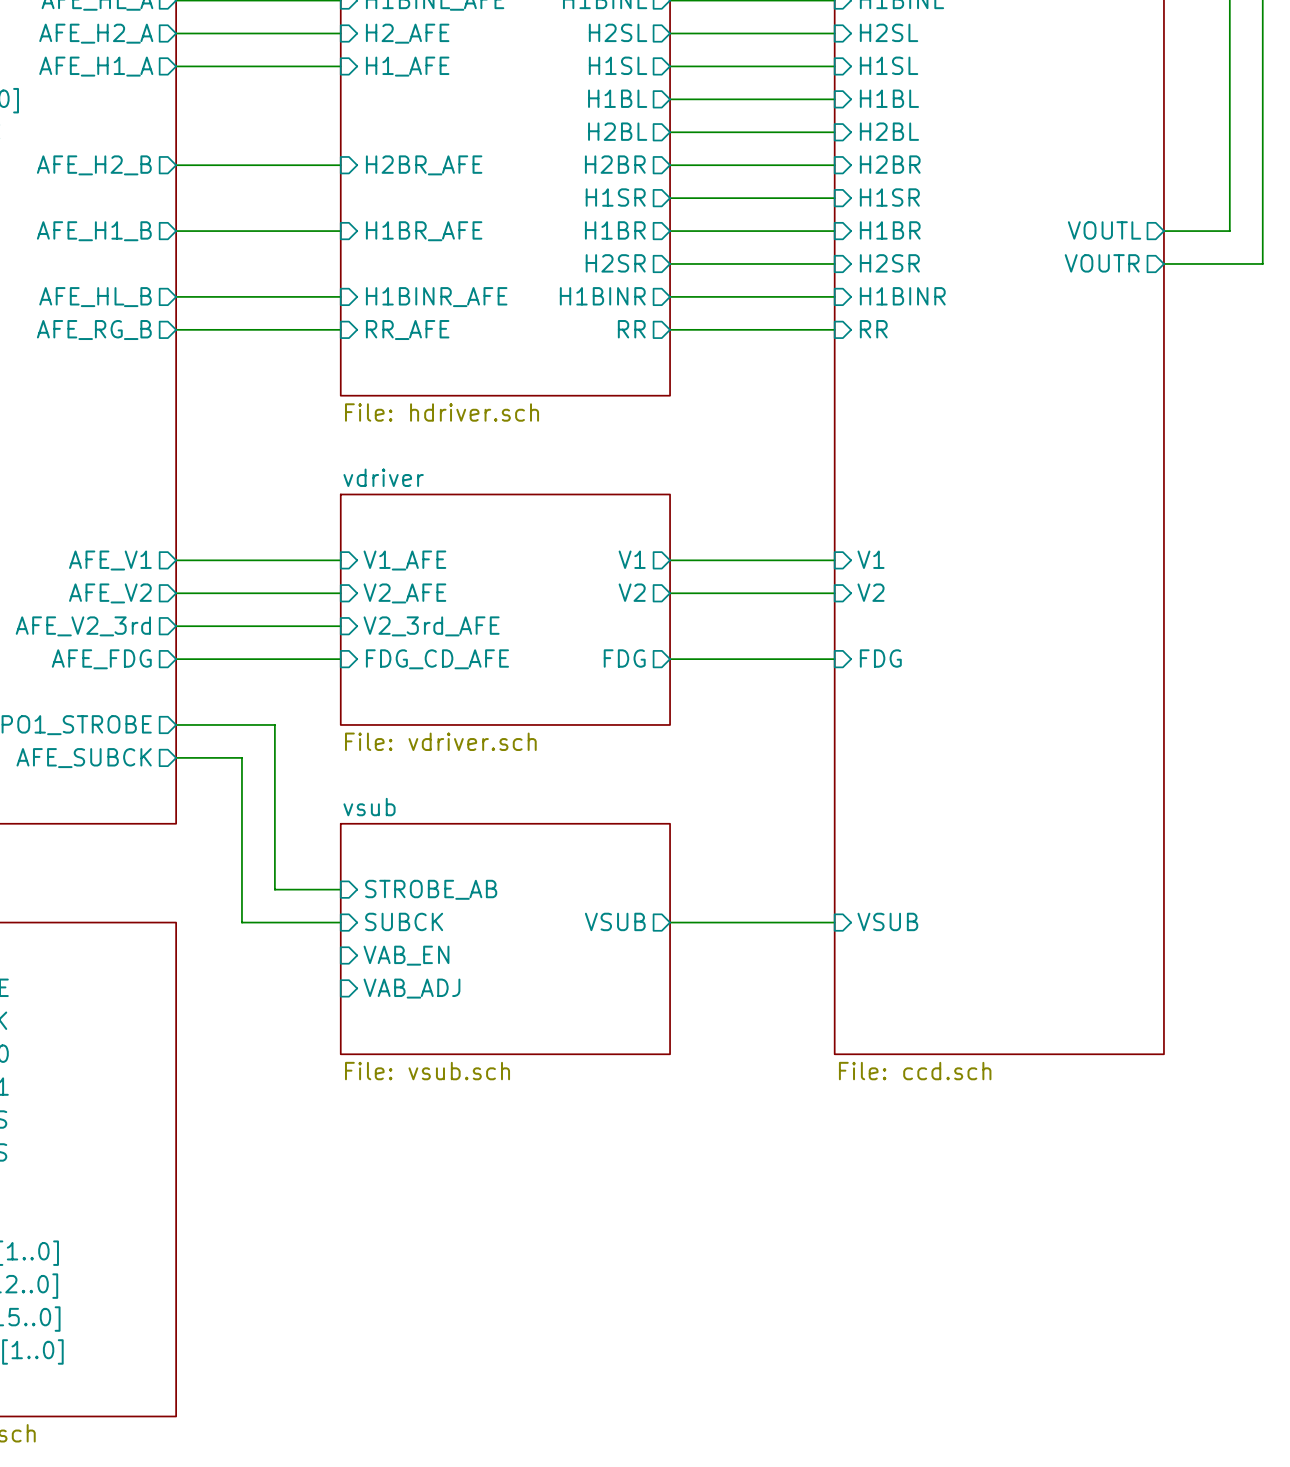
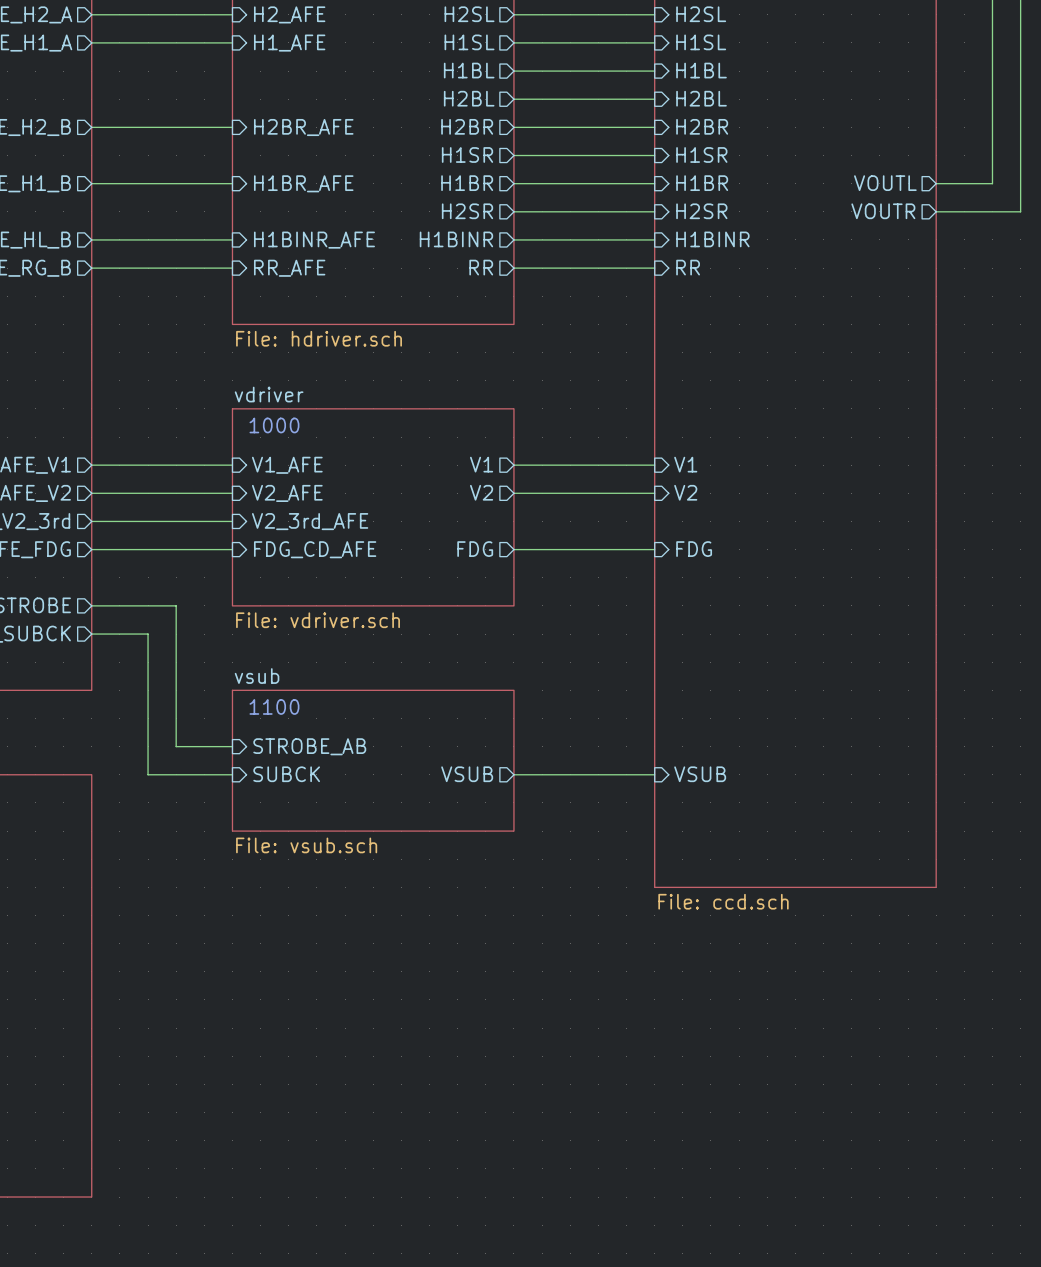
text: none -> 1000 (274, 425)
text: none -> 1100 (274, 706)
sheet vsub: none -> File: vsub.sch (373, 760)
sheet vsub: File: vsub.sch (505, 939) -> none
sheet pin: VAB_EN (406, 955) -> none
sheet pin: VAB_ADJ (411, 988) -> none

